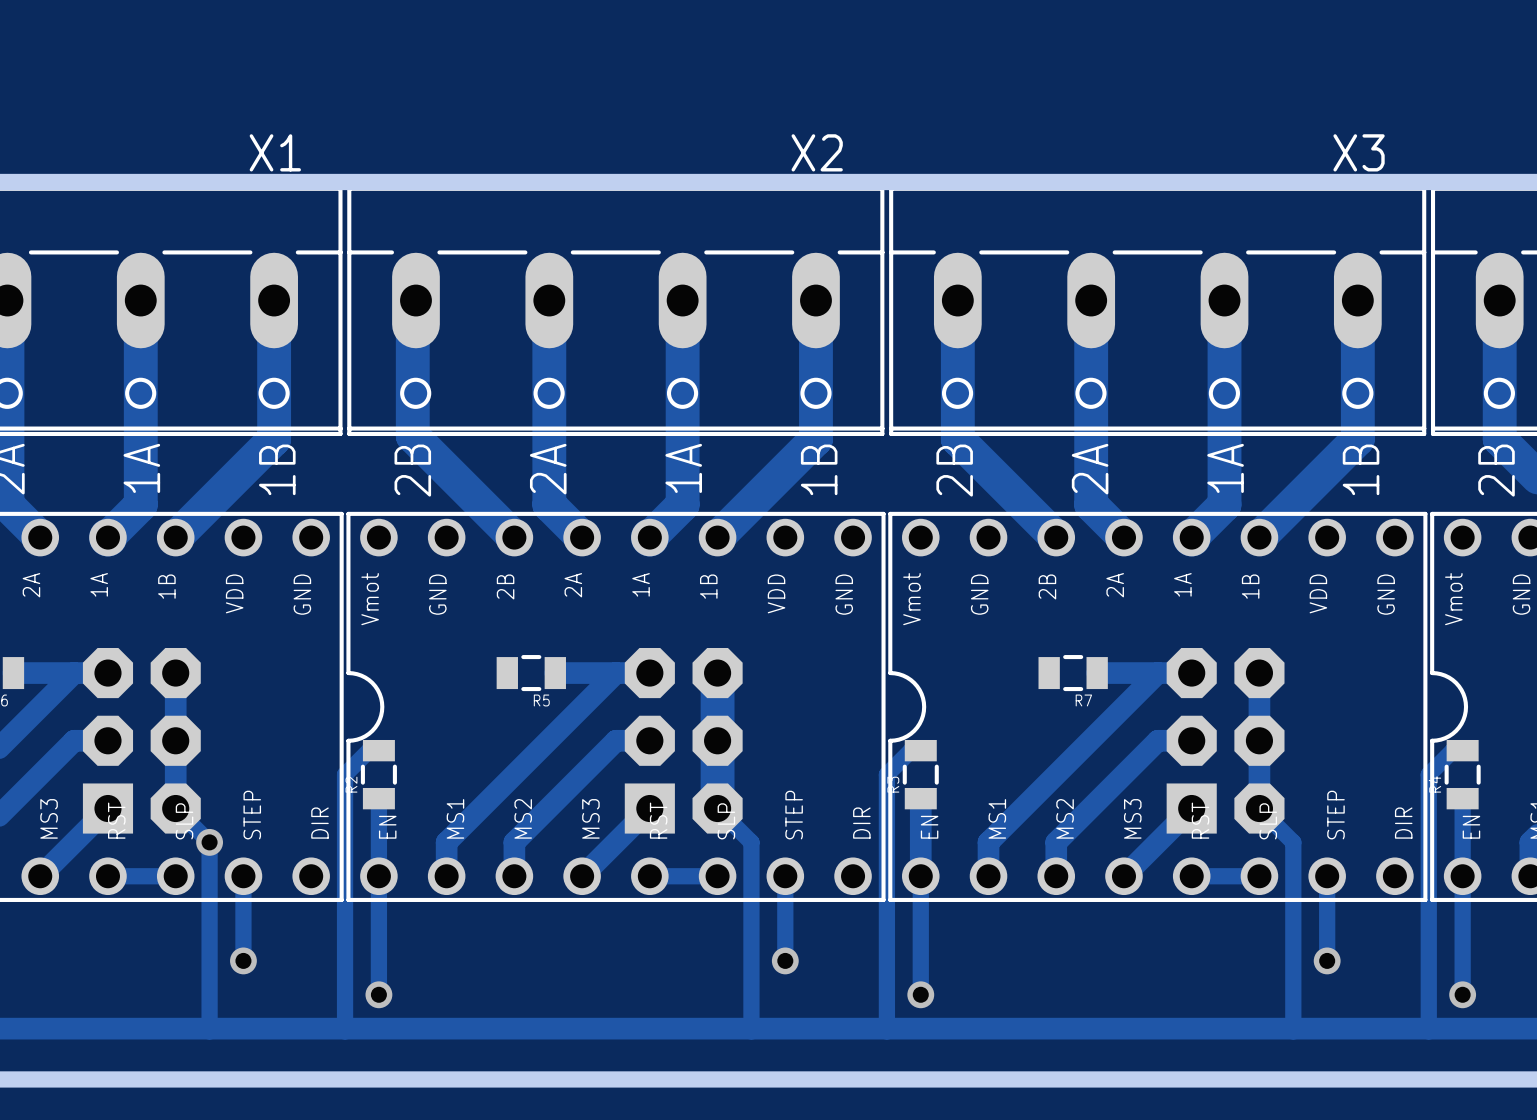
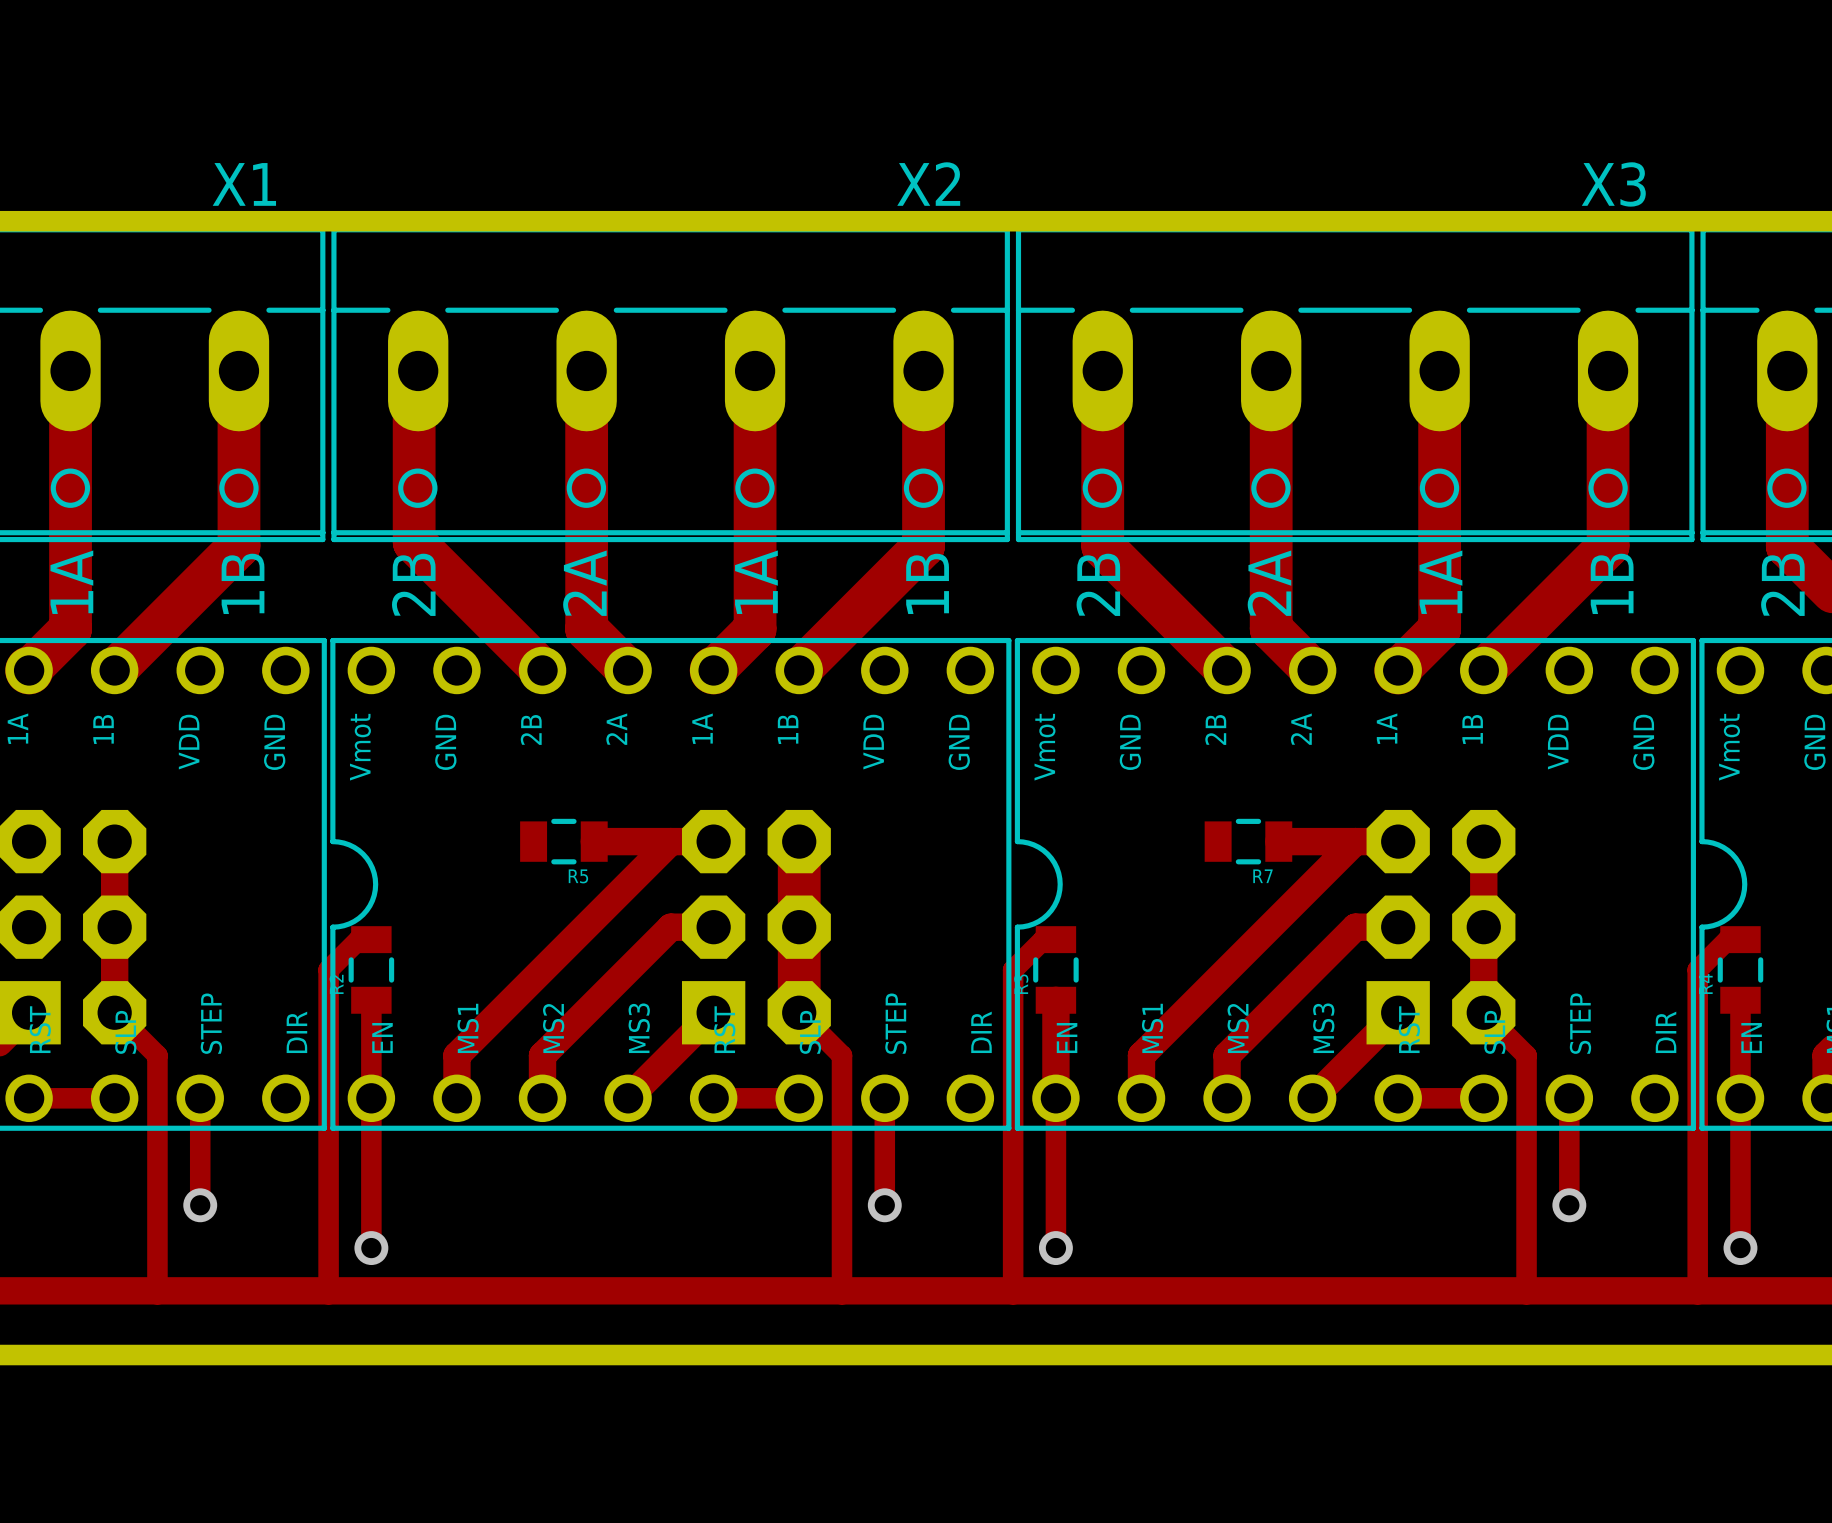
via: (209, 842) -> none

